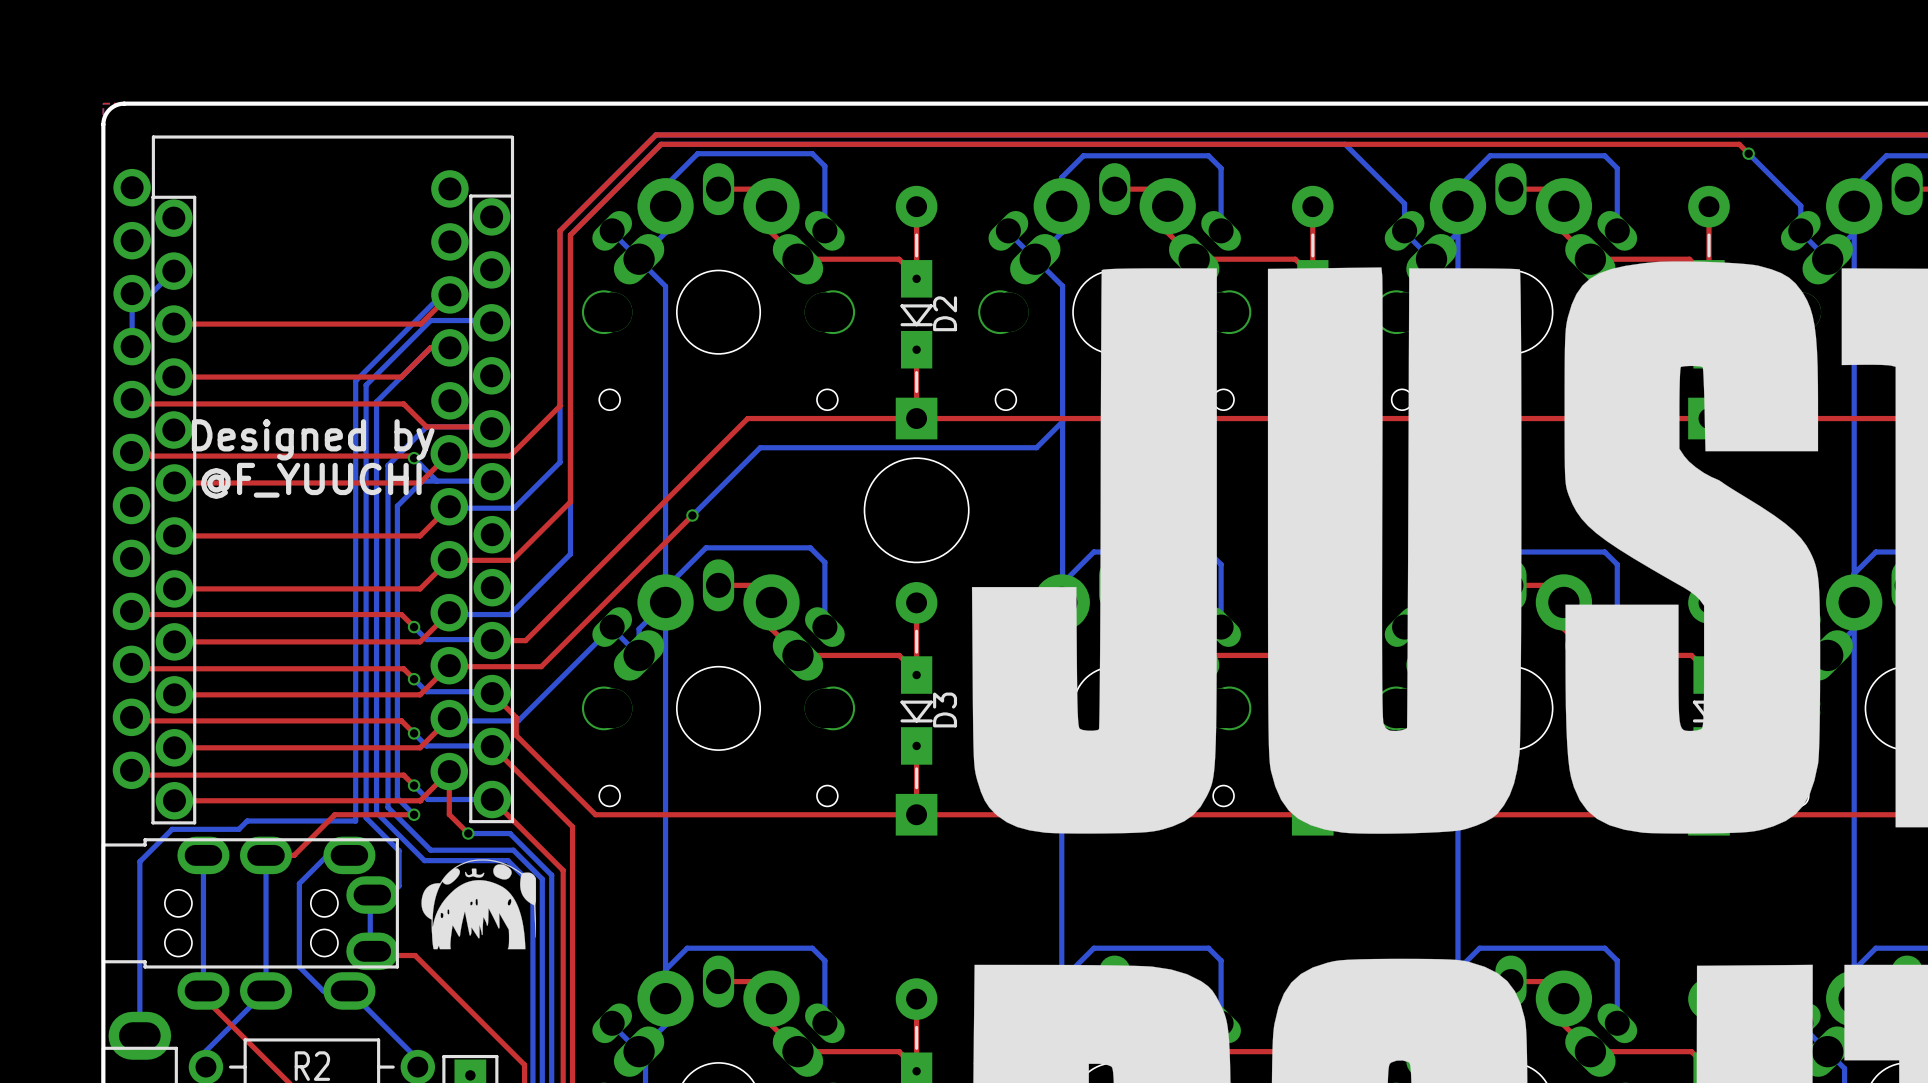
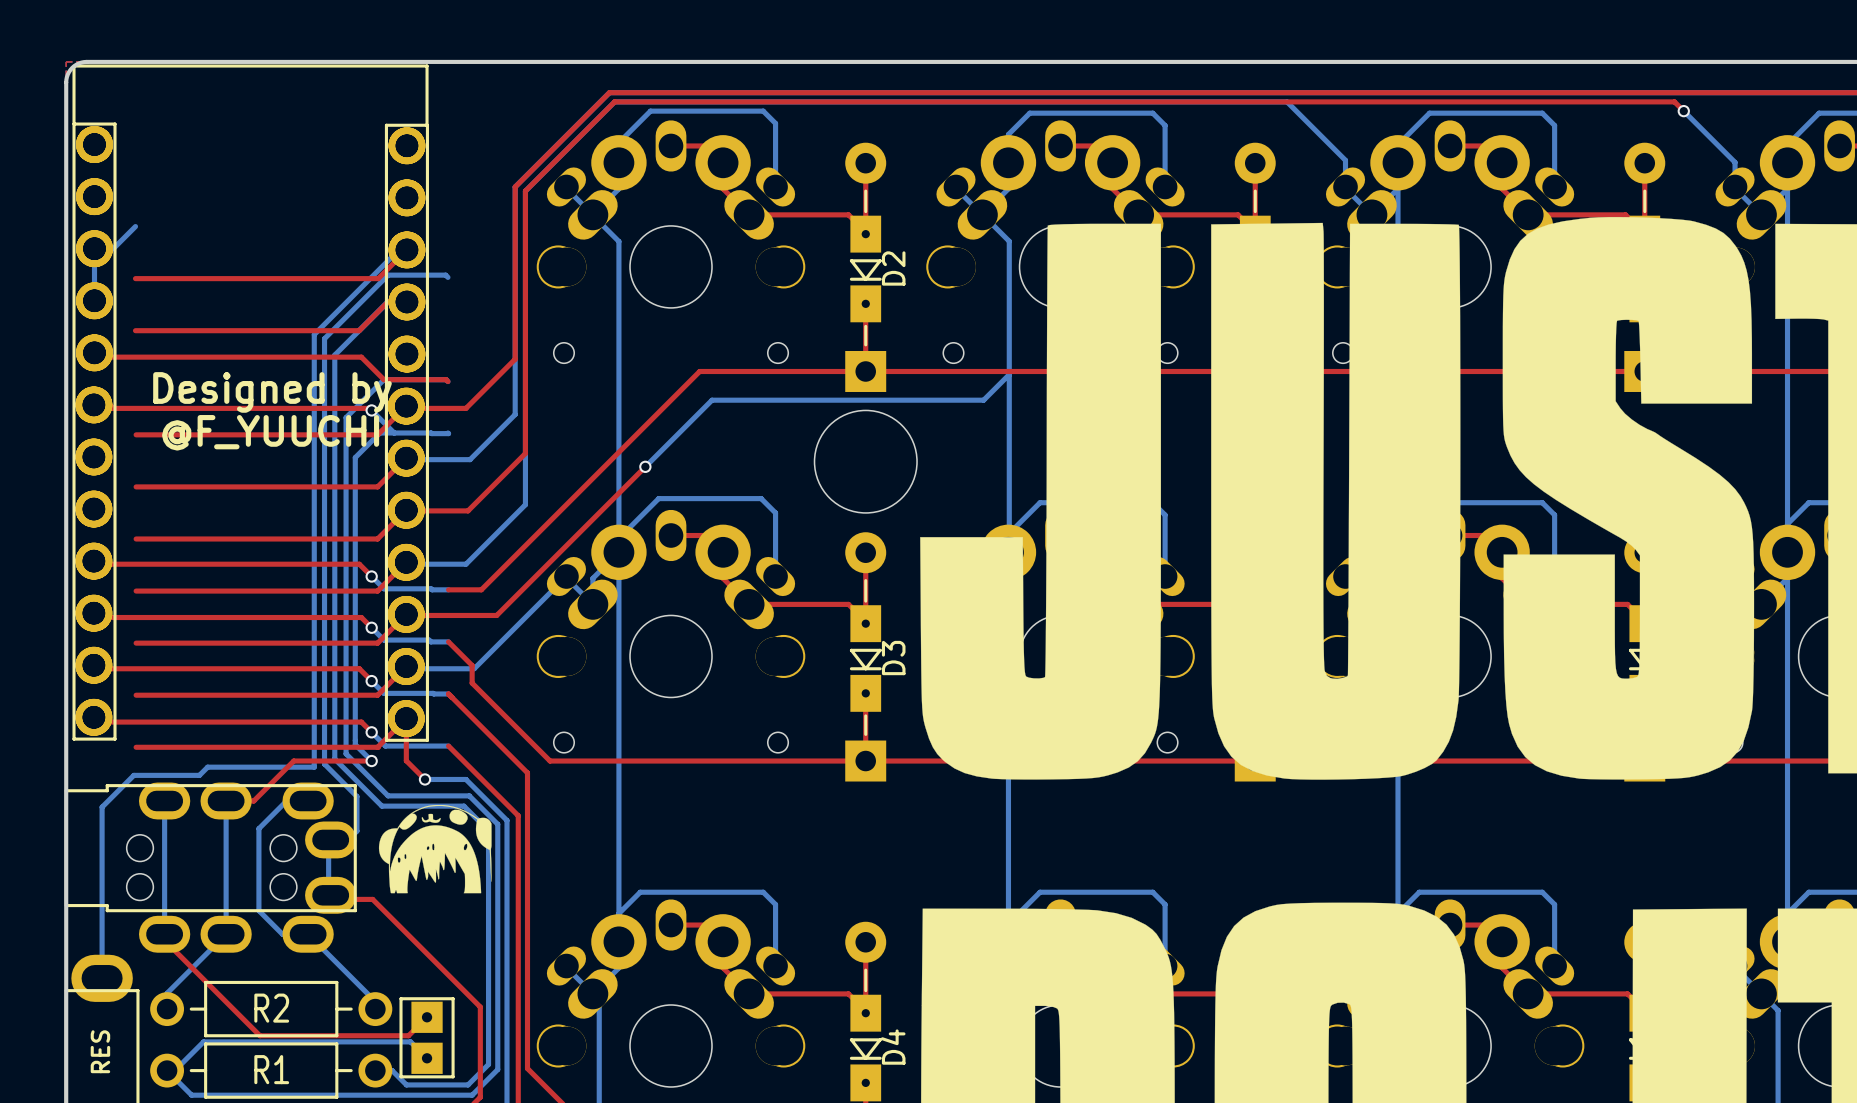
part side: bottom (332, 479) -> top (250, 403)

